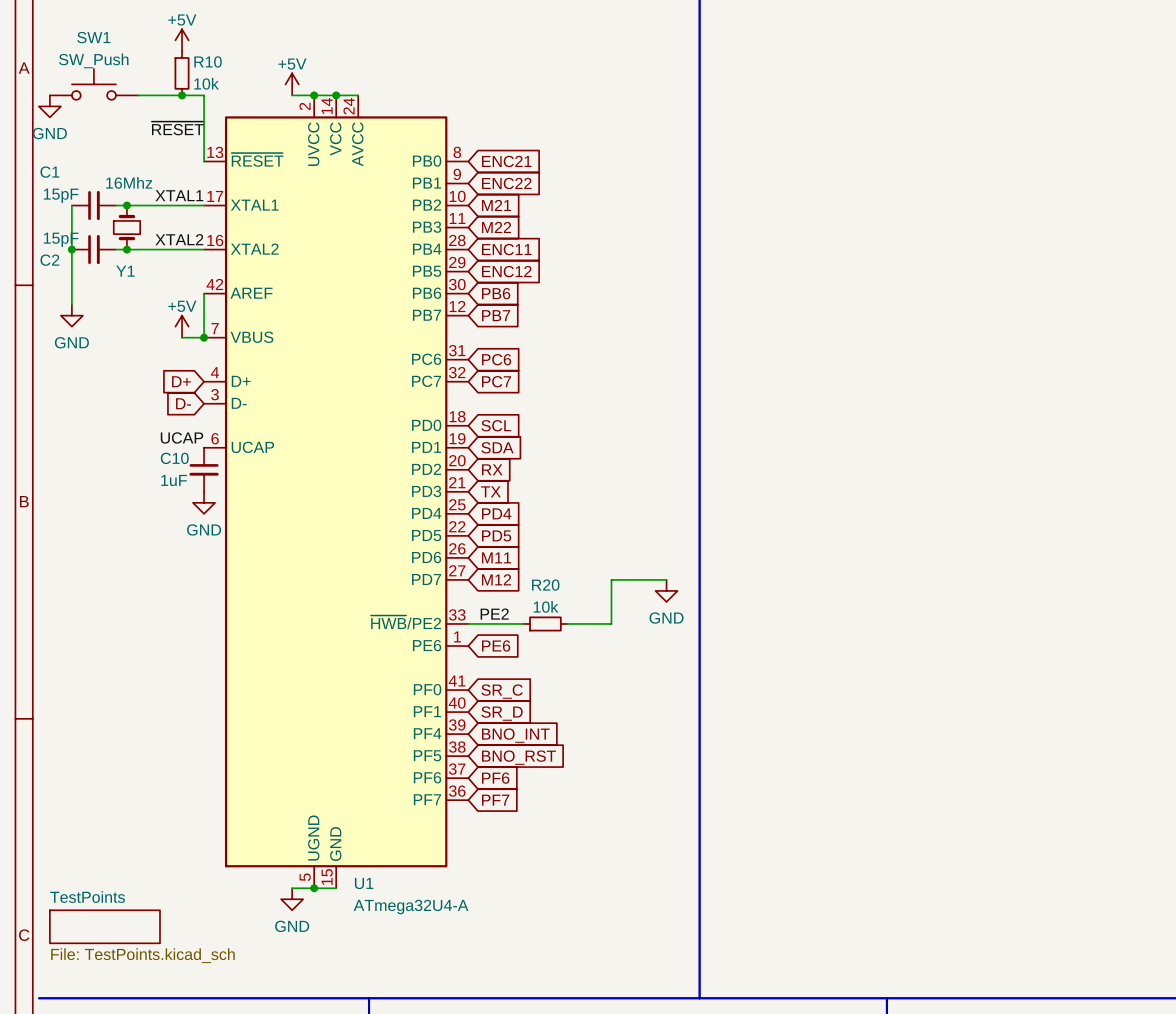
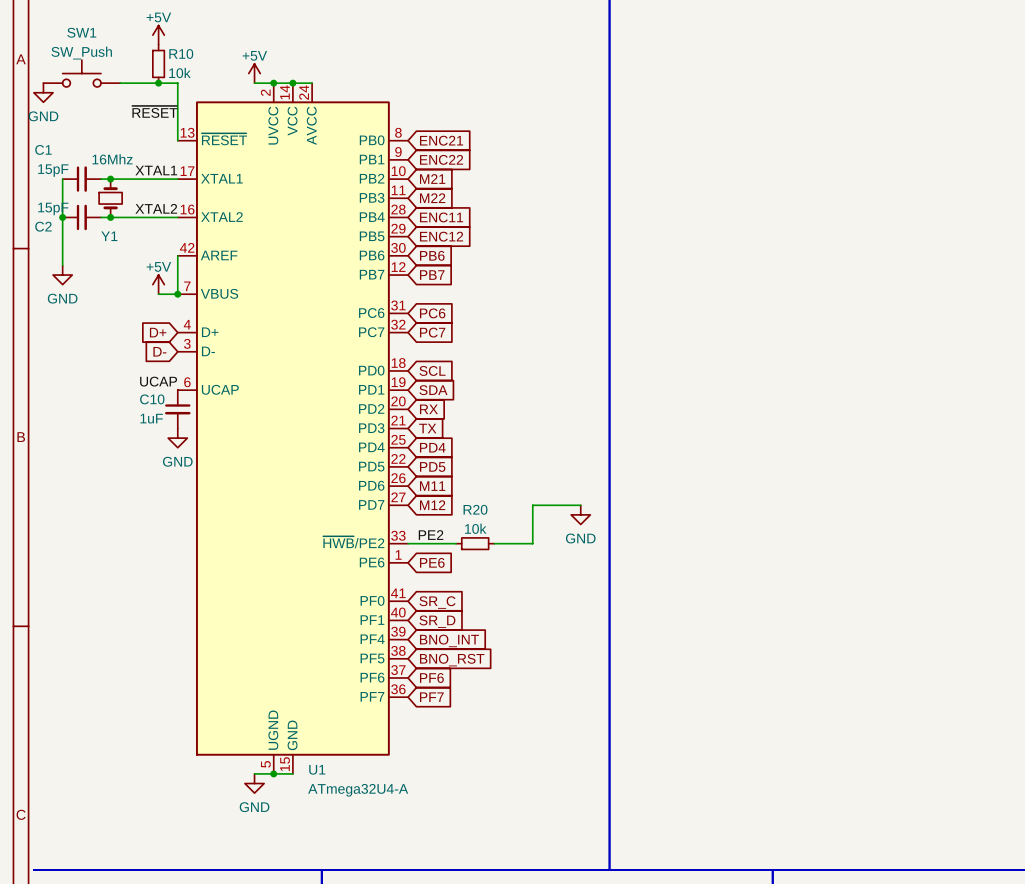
sheet TestPoints: File: TestPoints.kicad_sch (104, 926) -> none

